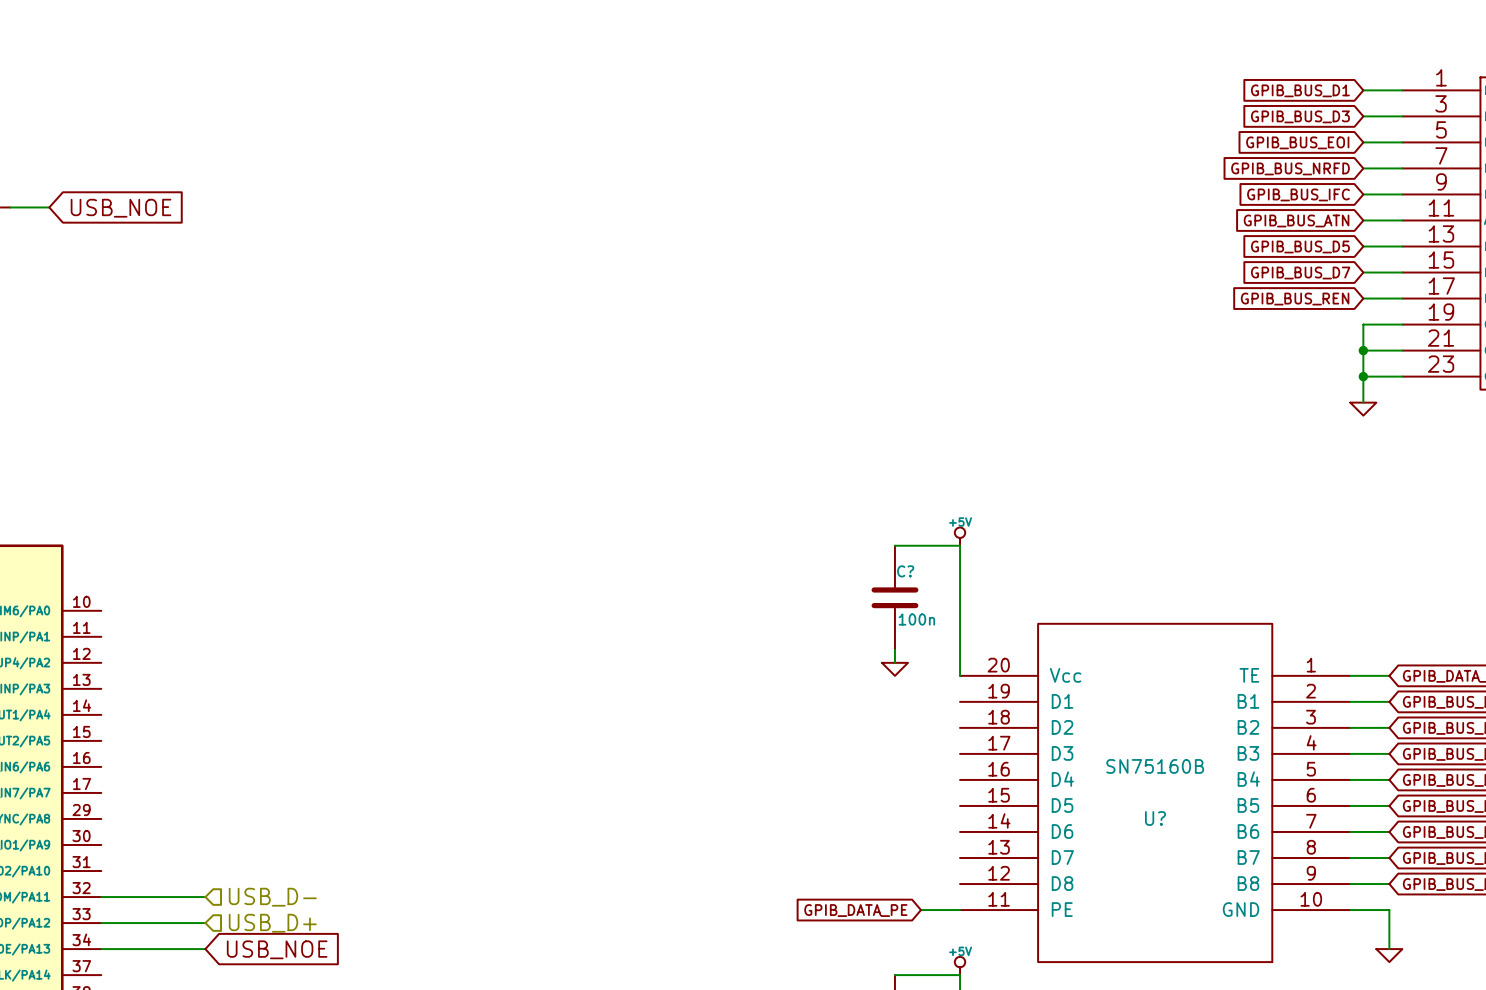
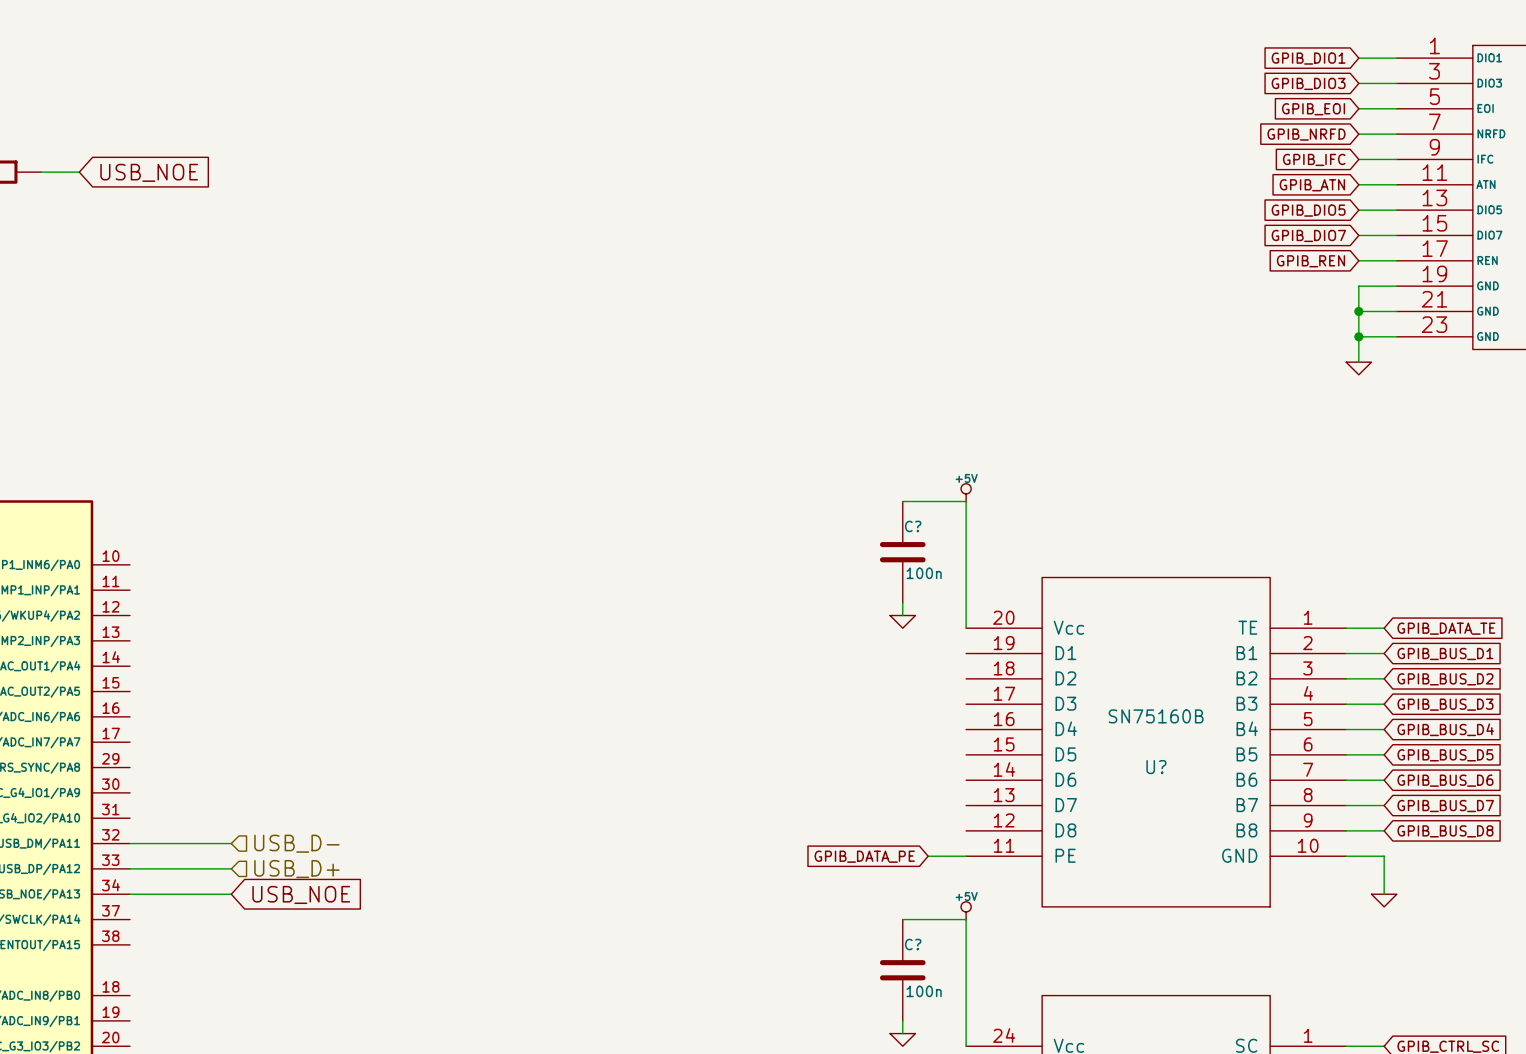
global label: GPIB_BUS_D1 (1300, 90) -> GPIB_DIO1 (1308, 58)
global label: GPIB_BUS_D3 (1300, 116) -> GPIB_DIO3 (1308, 83)
global label: GPIB_BUS_EOI (1297, 142) -> GPIB_EOI (1313, 109)
global label: GPIB_BUS_NRFD (1290, 168) -> GPIB_NRFD (1306, 134)
global label: GPIB_BUS_IFC (1298, 194) -> GPIB_IFC (1314, 159)
global label: GPIB_BUS_ATN (1296, 220) -> GPIB_ATN (1312, 185)
global label: GPIB_BUS_D5 (1300, 246) -> GPIB_DIO5 (1308, 210)
global label: GPIB_BUS_D7 (1300, 273) -> GPIB_DIO7 (1308, 235)
global label: GPIB_BUS_REN (1295, 299) -> GPIB_REN (1310, 261)

